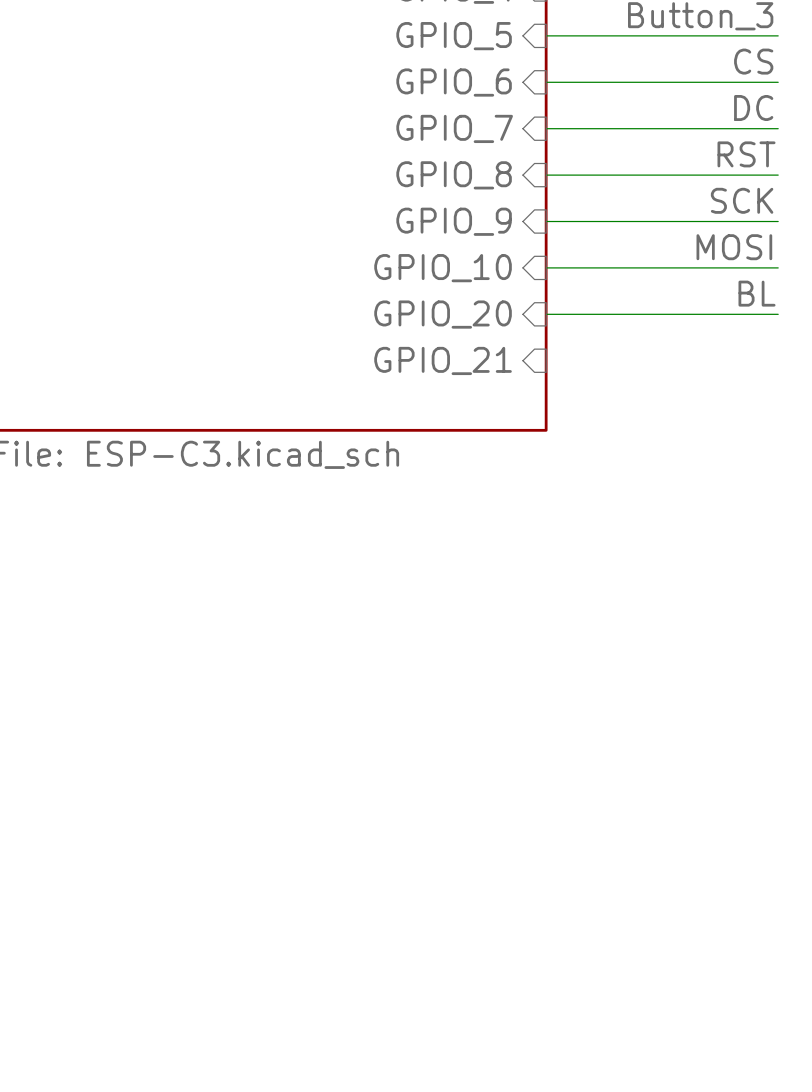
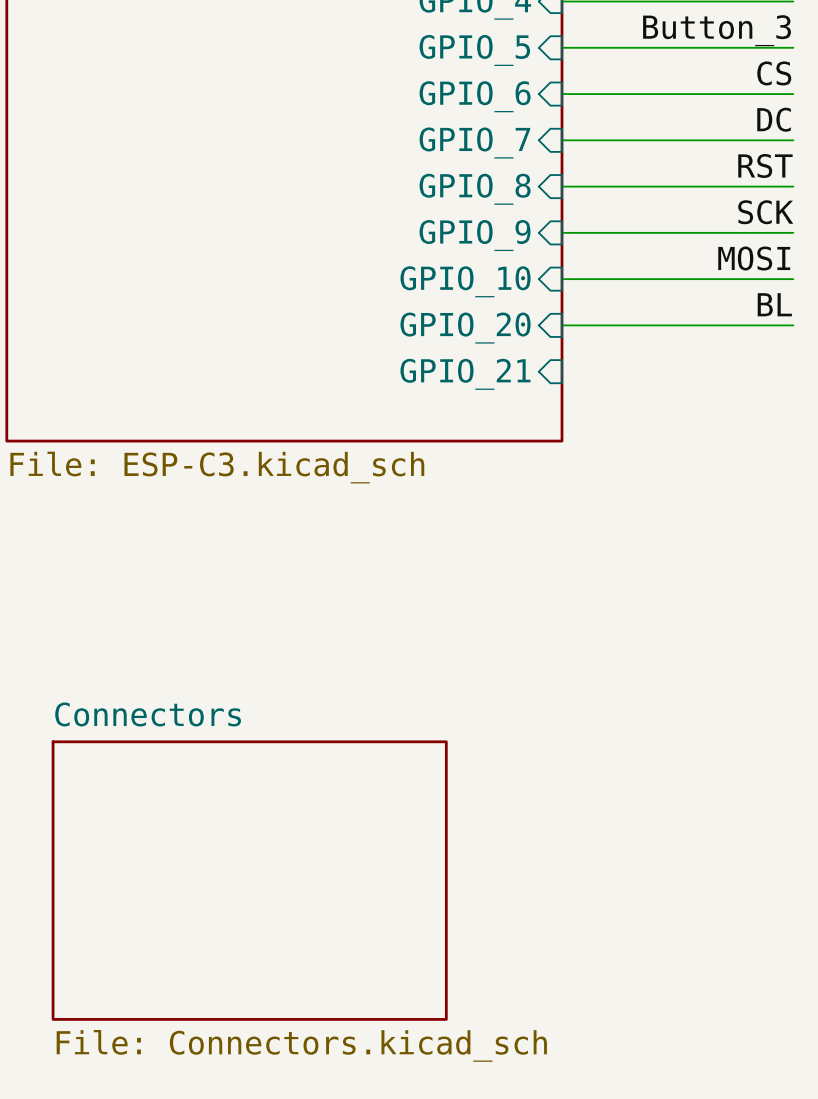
sheet Connectors: none -> File: Connectors.kicad_sch (249, 880)

